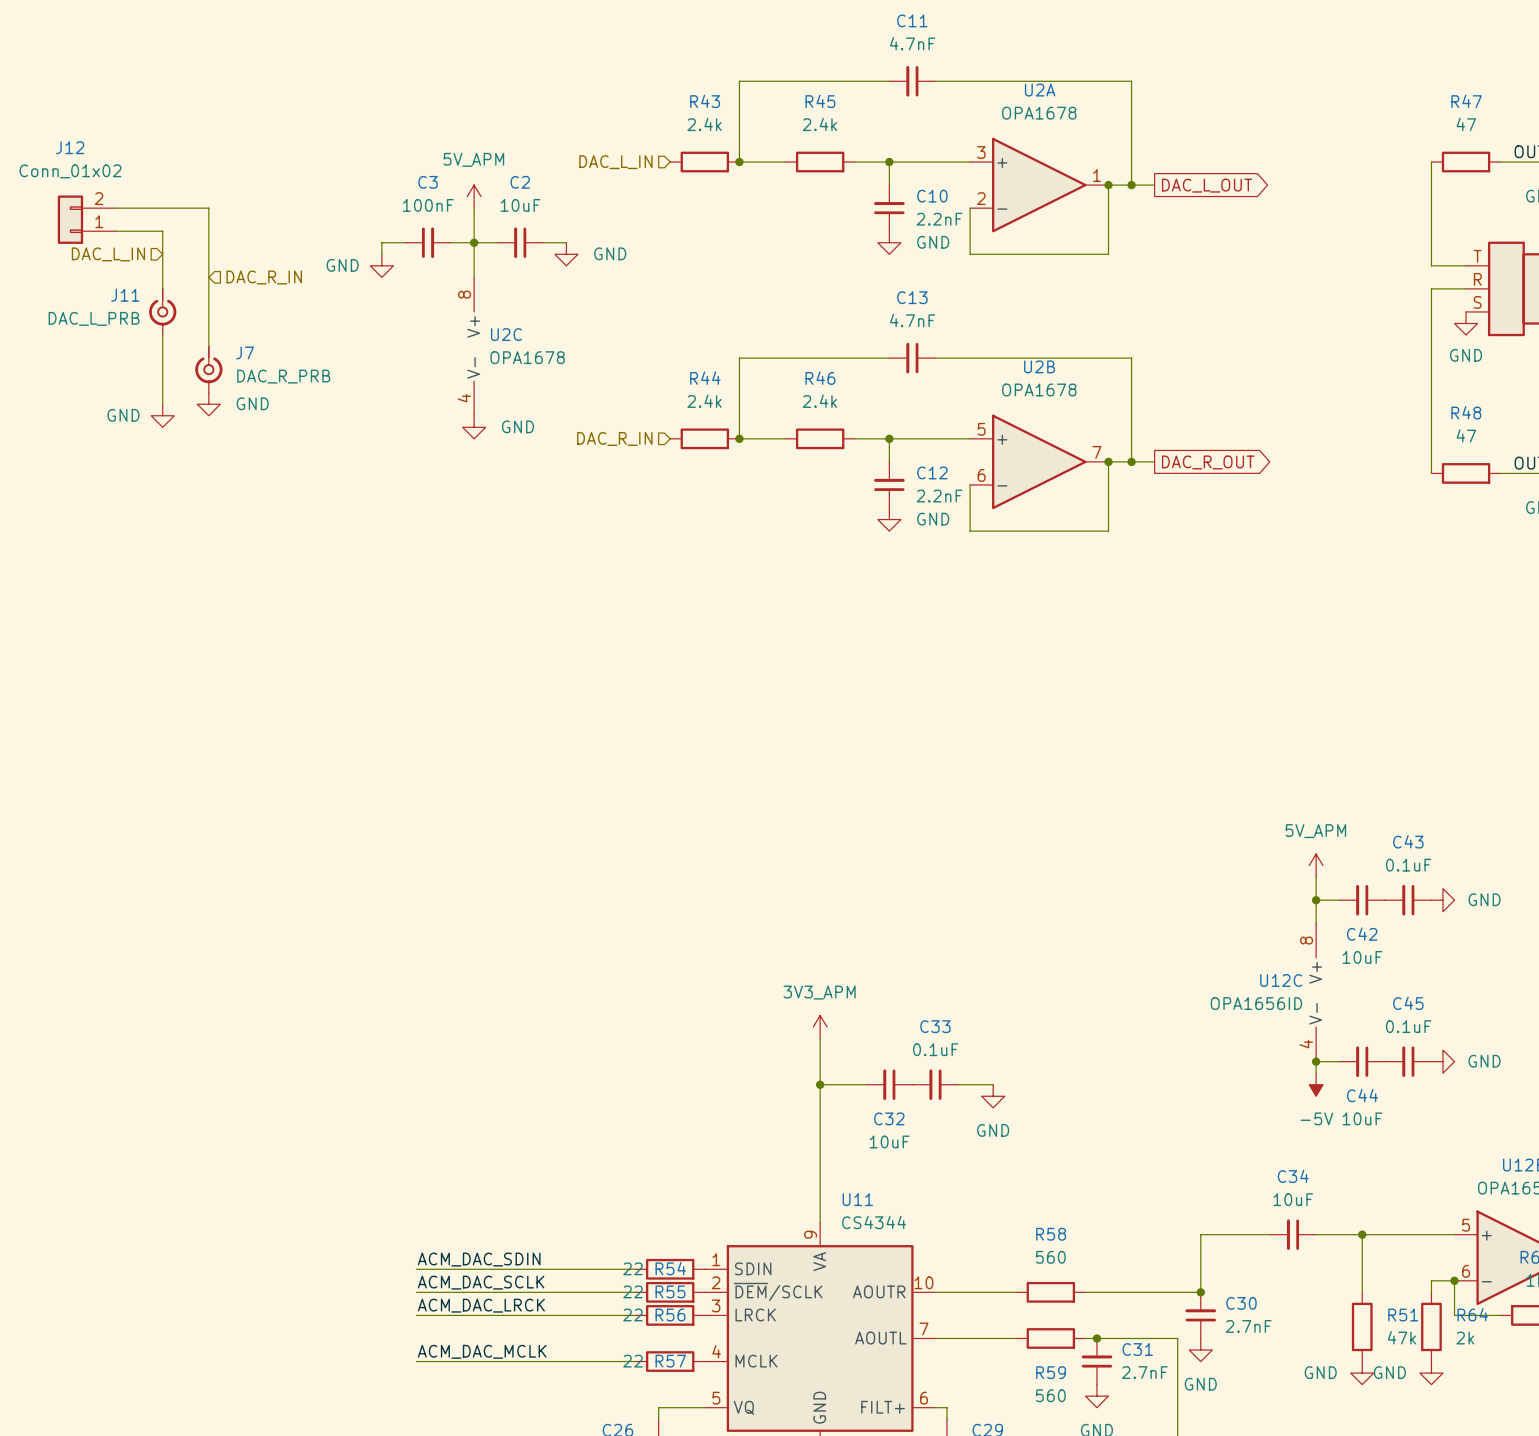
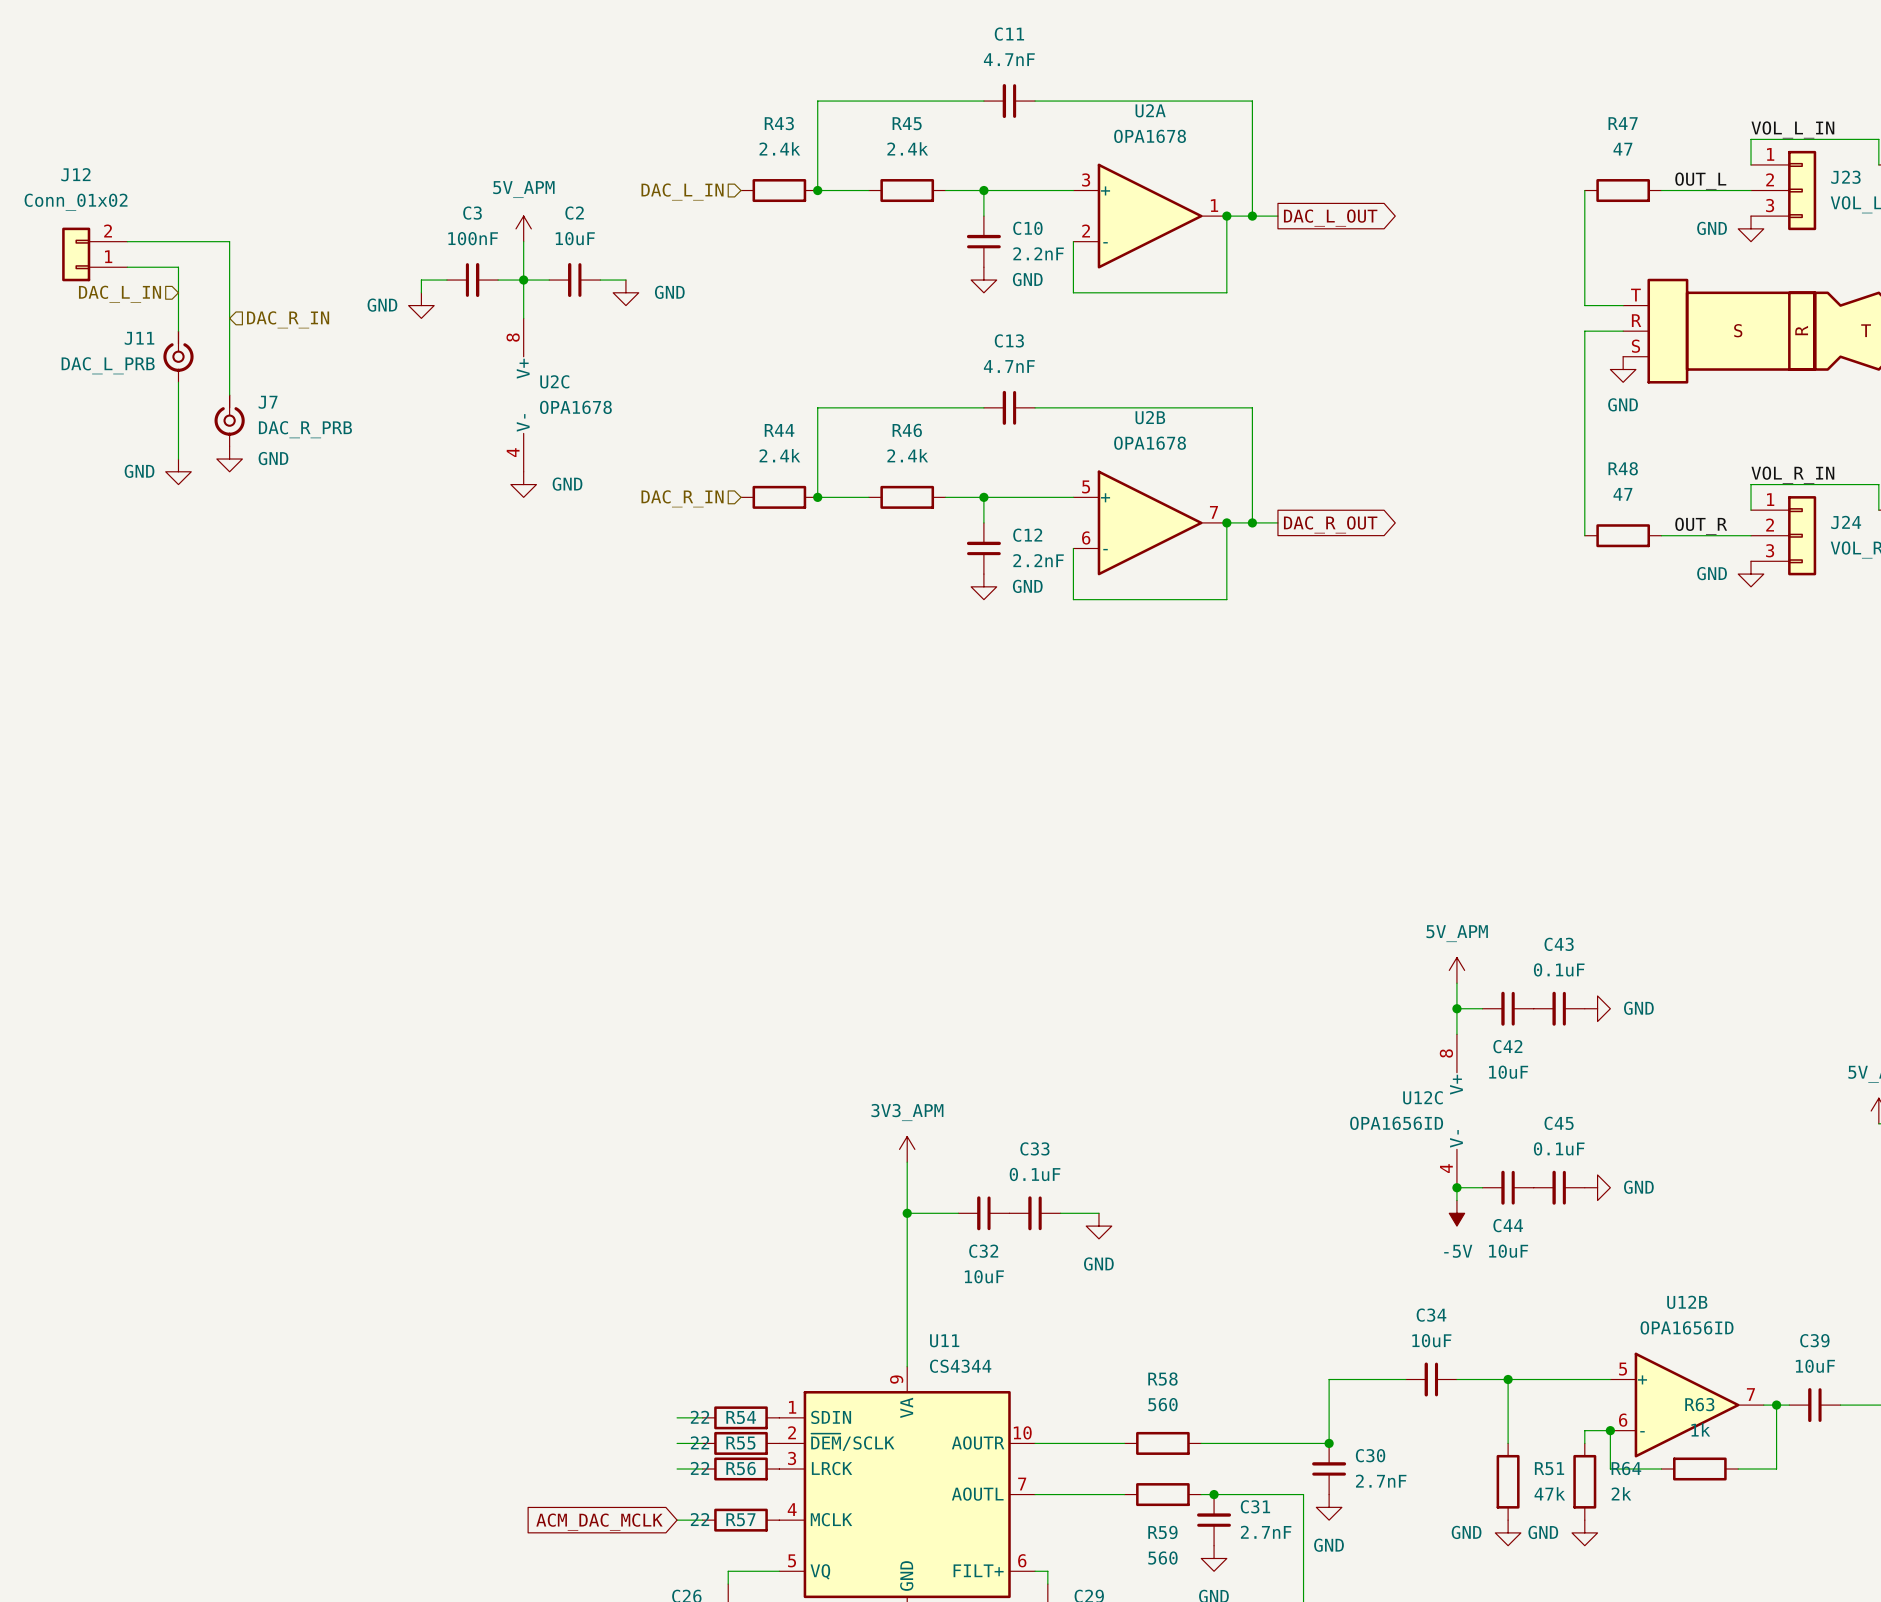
label: ACM_DAC_SDIN (479, 1259) -> none
wire: (416, 1269) (612, 1269) -> none
label: ACM_DAC_SCLK (481, 1282) -> none
wire: (416, 1292) (612, 1292) -> none
label: ACM_DAC_LRCK (481, 1305) -> none
wire: (416, 1315) (612, 1315) -> none
label: ACM_DAC_MCLK (482, 1351) -> none
wire: (416, 1361) (612, 1361) -> none
global label: none -> ACM_DAC_MCLK (599, 1522)

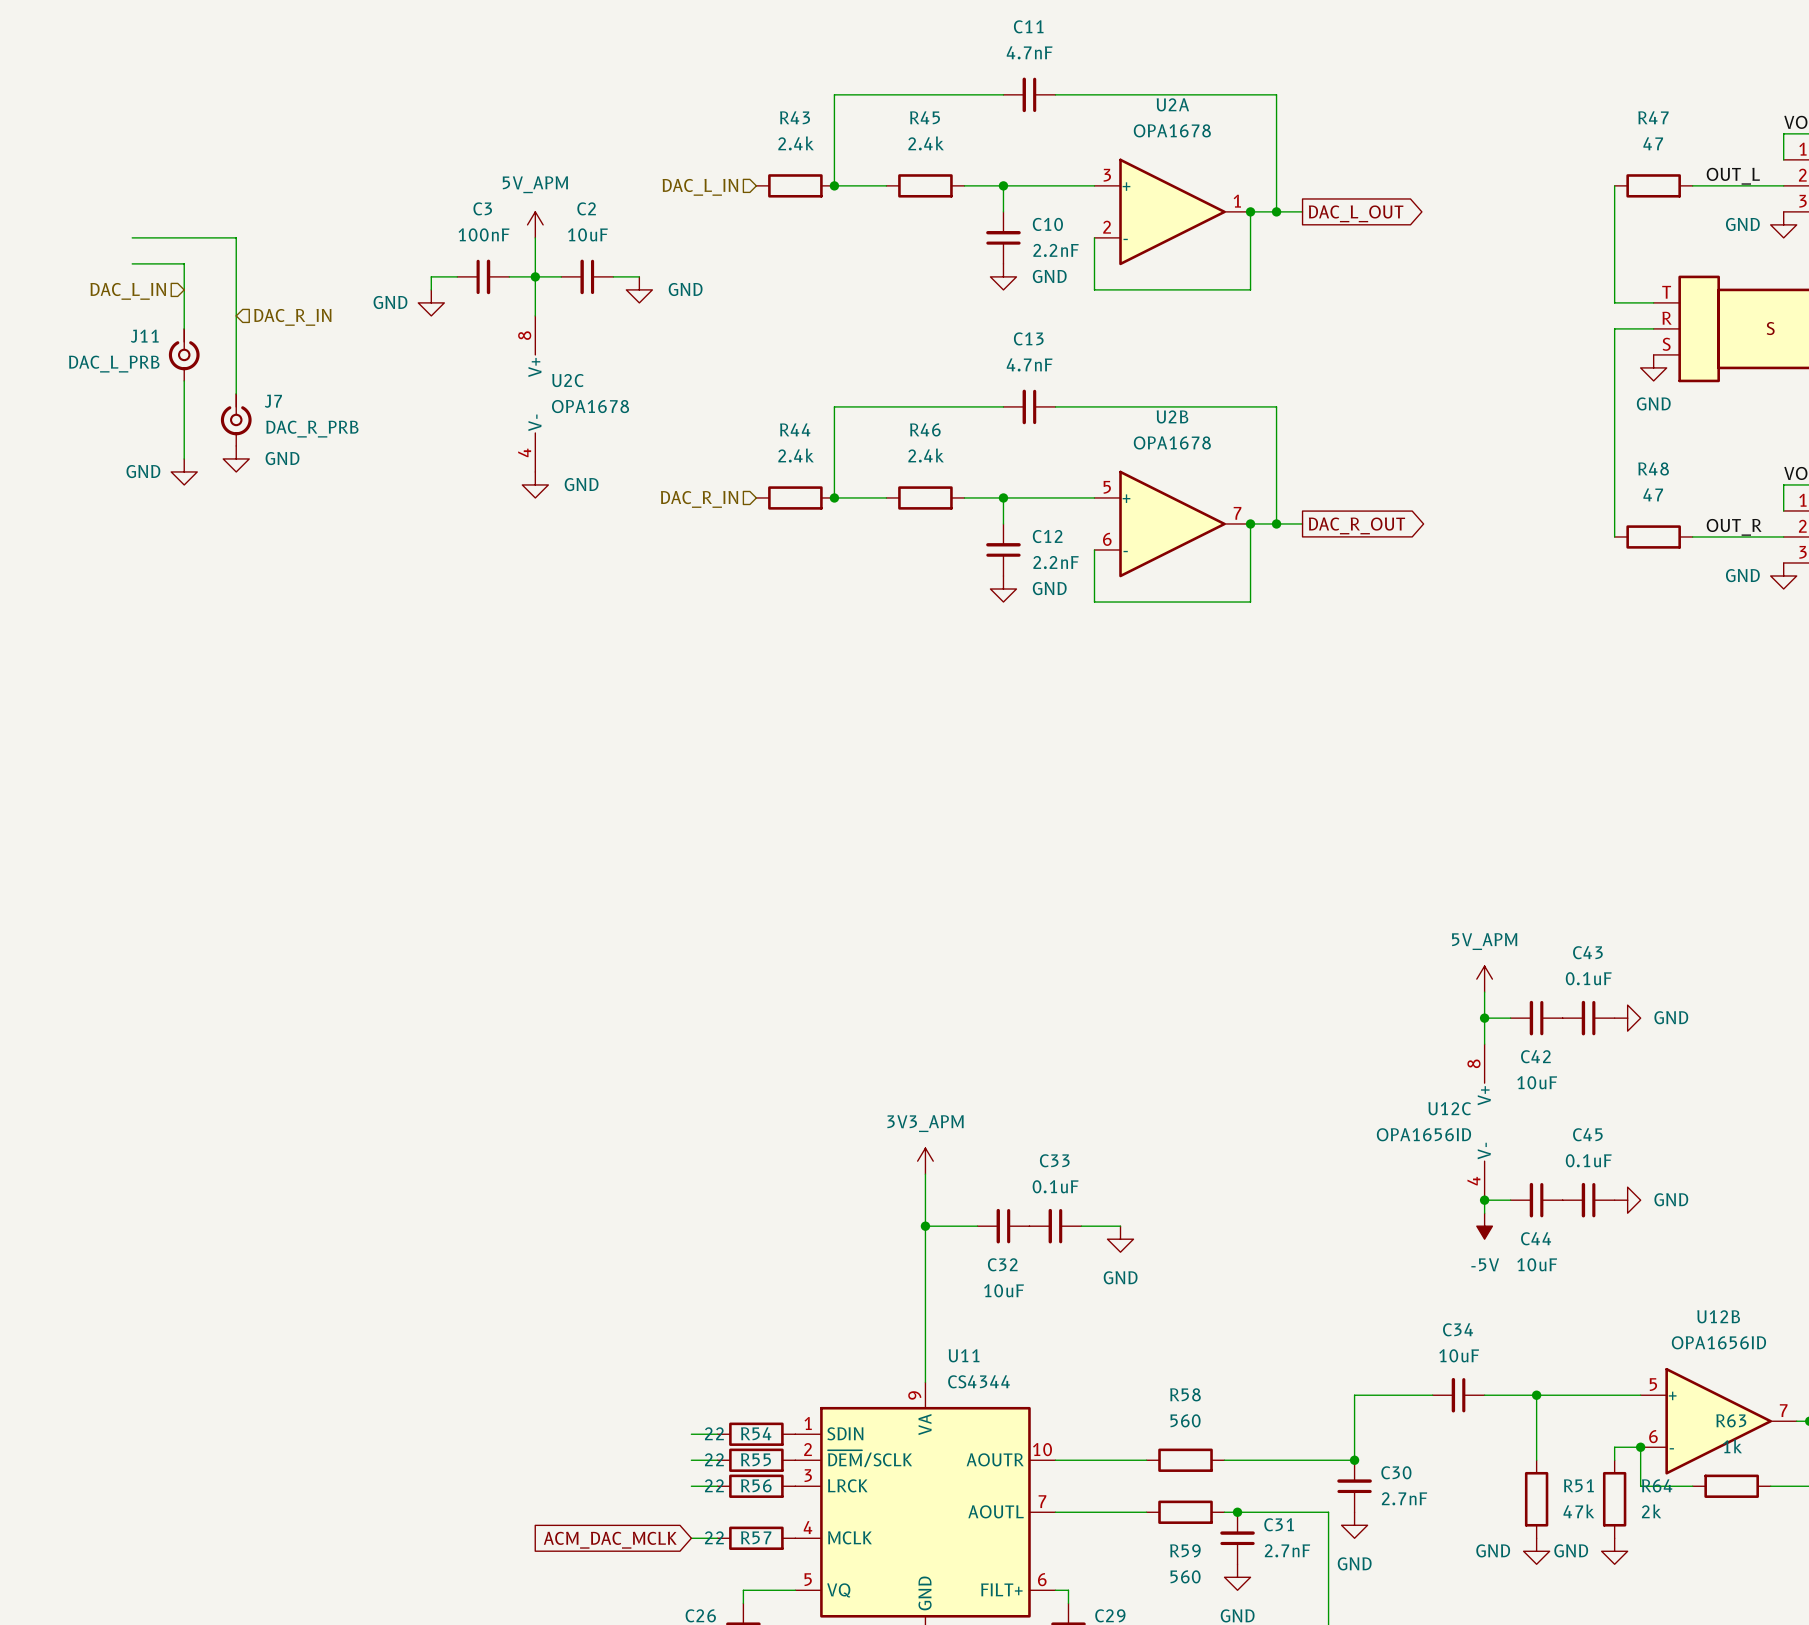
J12: Conn_01x02 (94, 254) -> none

